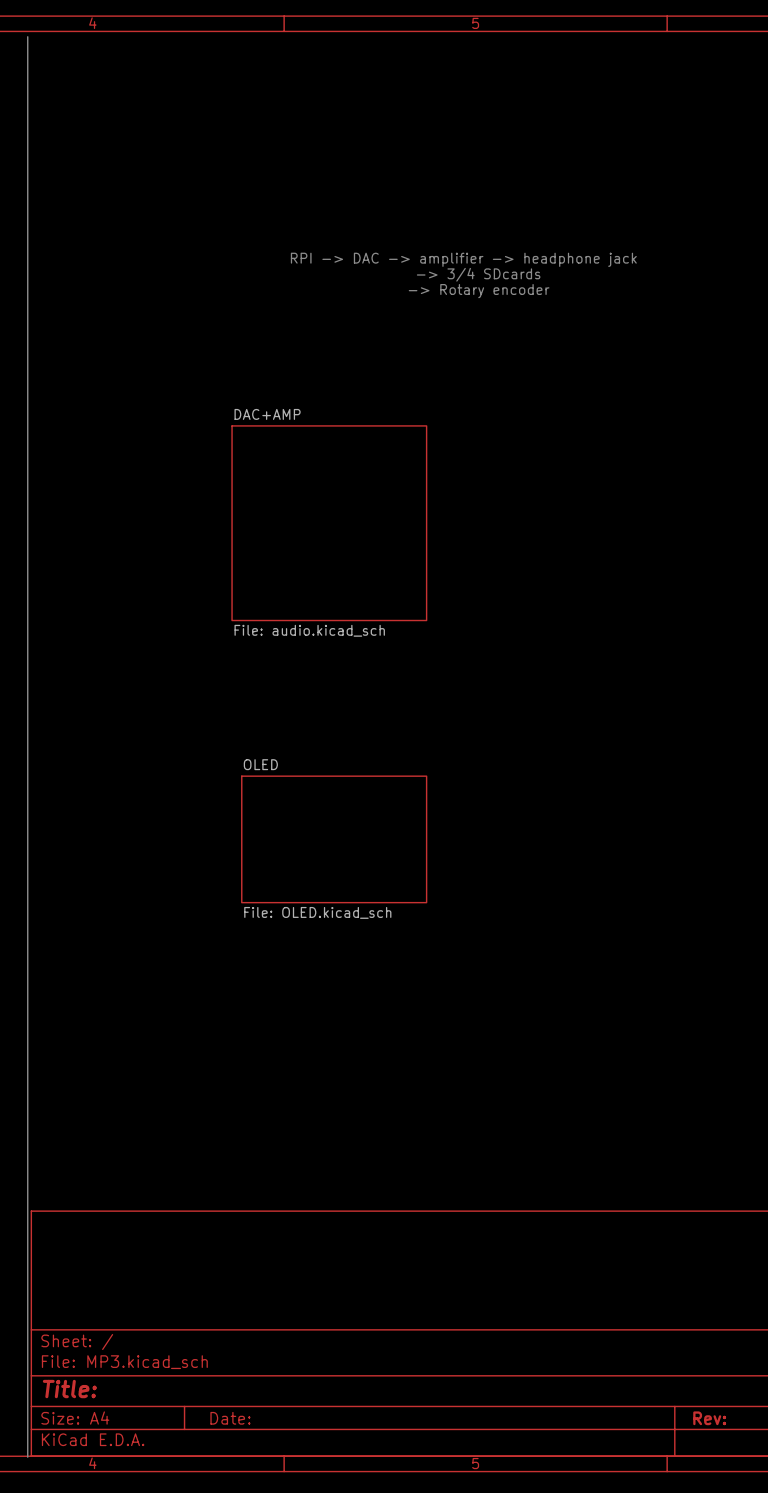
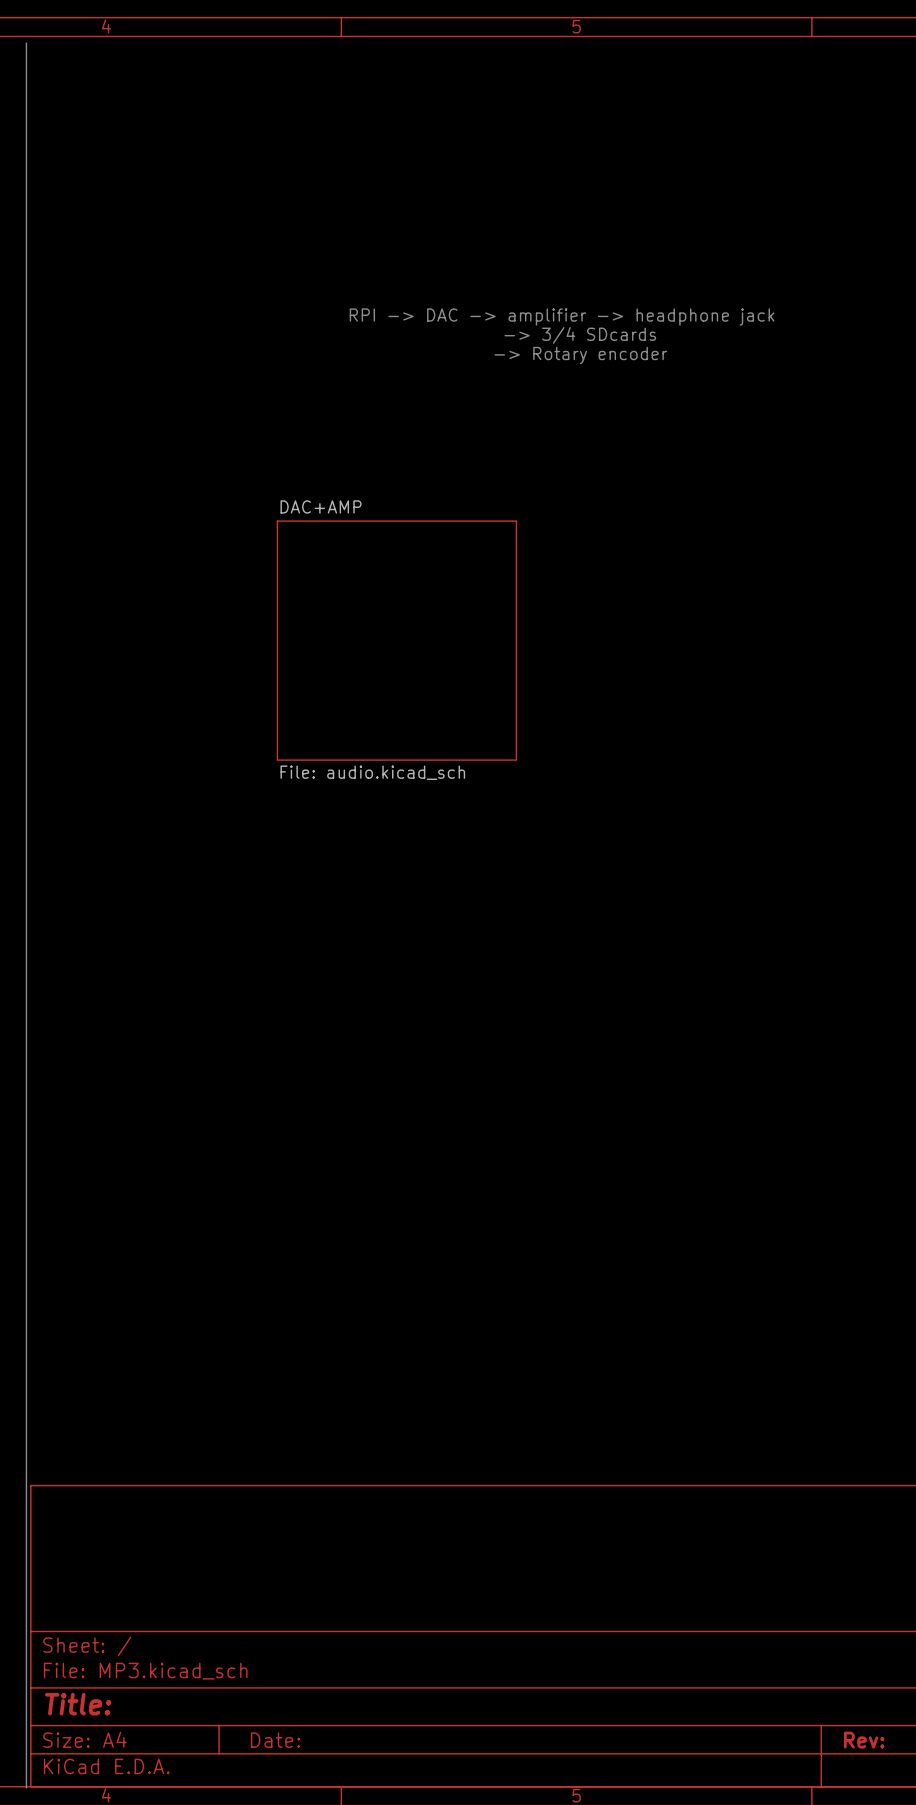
sheet OLED: File: OLED.kicad_sch (334, 839) -> none

